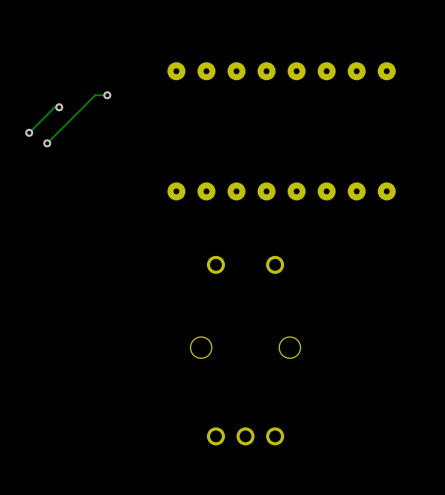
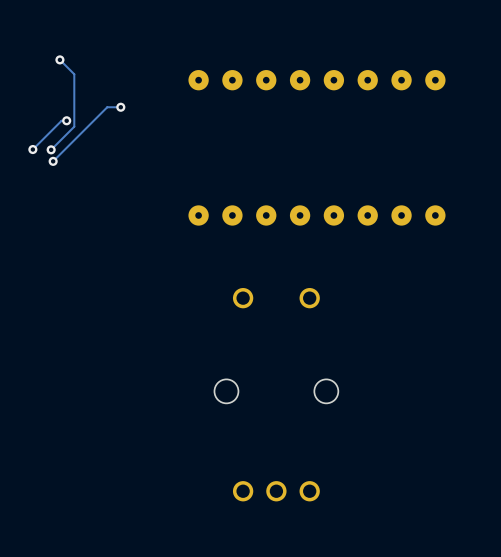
track: none -> (59, 59) (74, 74) (74, 126) (51, 149)
via: none -> (59, 59)
via: none -> (51, 149)

